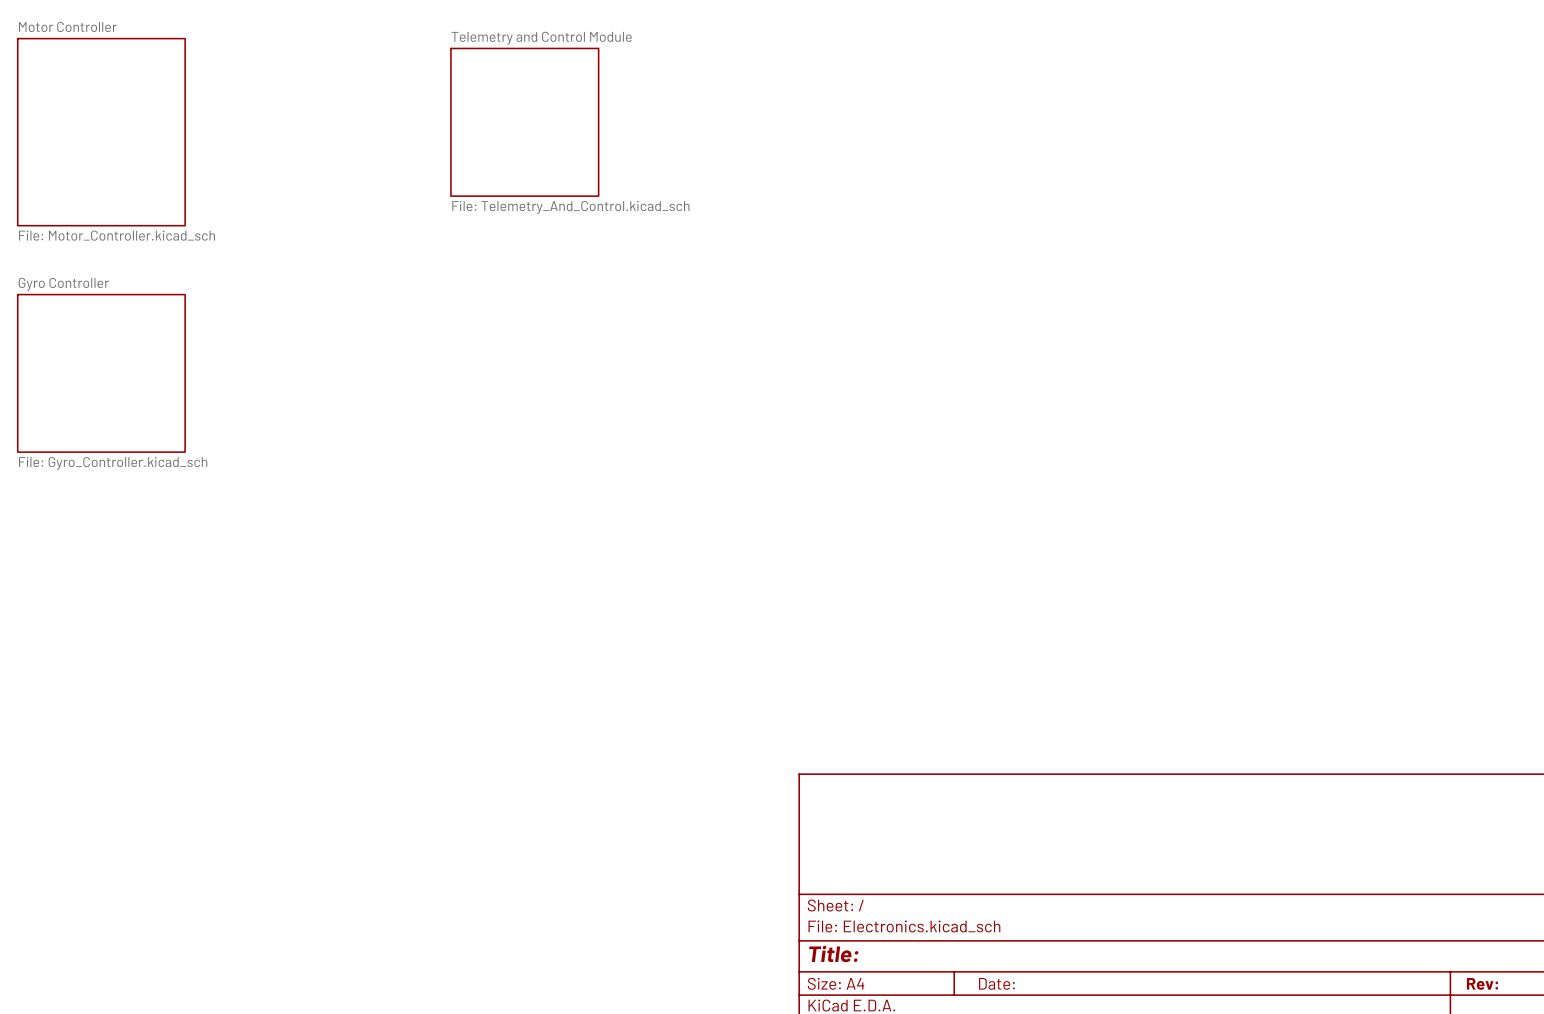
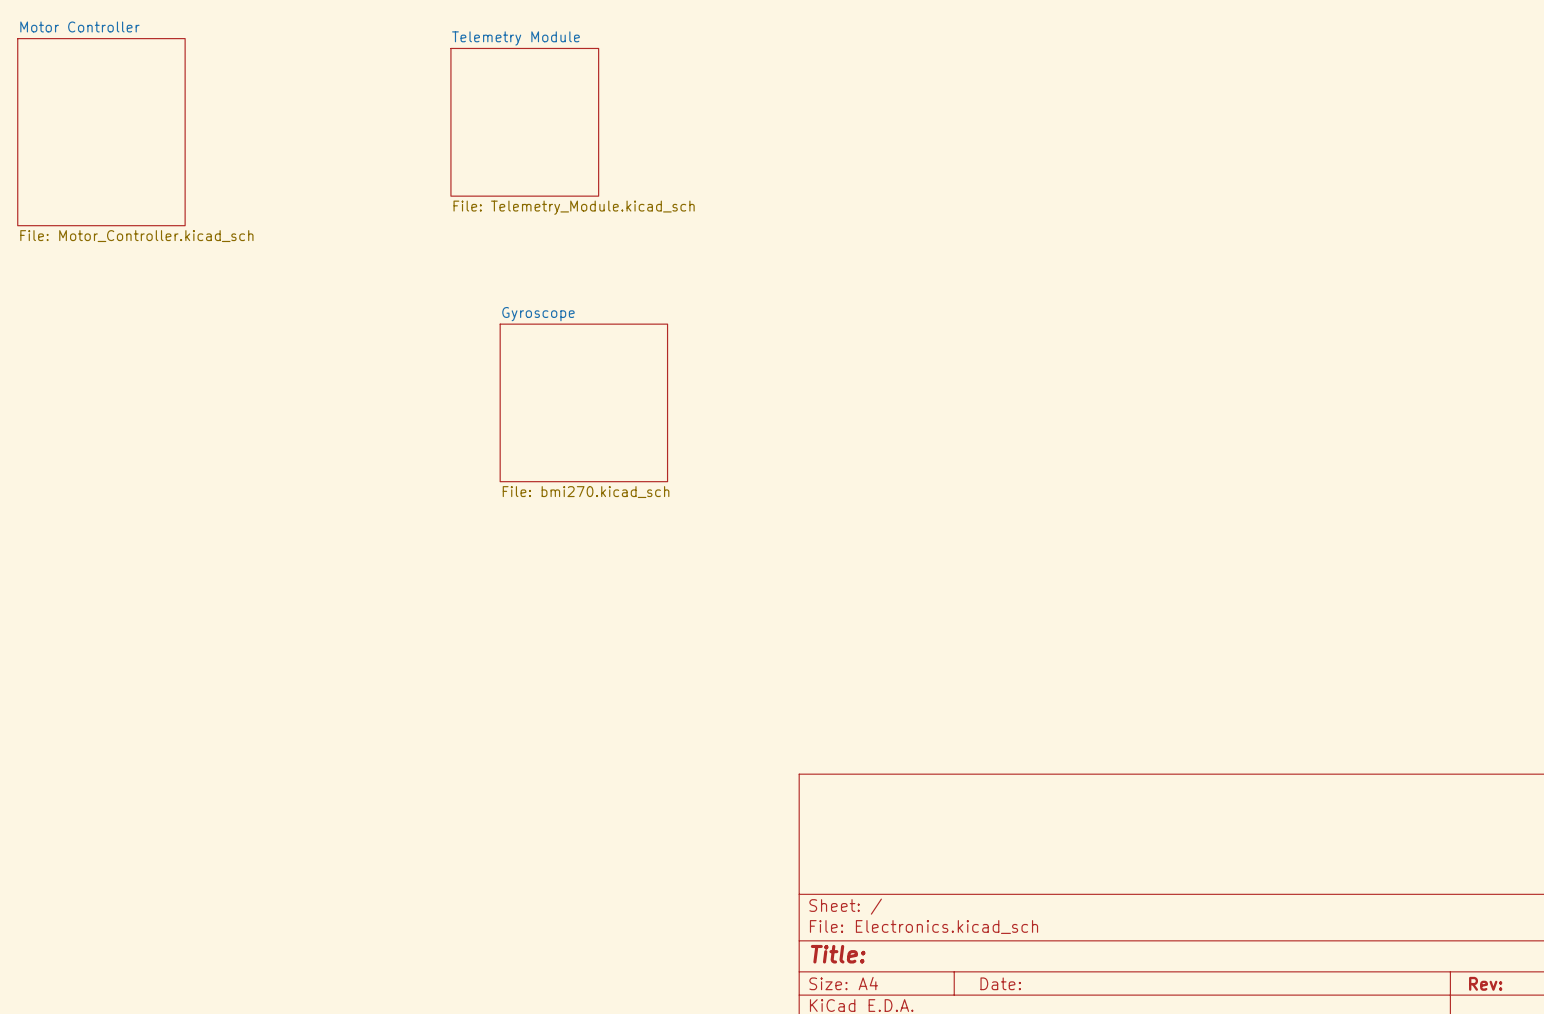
sheet Telemetry and Control Module name: Telemetry and Control Module (541, 38) -> Telemetry Module (515, 38)
sheet Telemetry and Control Module value: File: Telemetry_And_Control.kicad_sch (570, 207) -> File: Telemetry_Module.kicad_sch (574, 207)
sheet Gyro Controller: File: Gyro_Controller.kicad_sch (101, 373) -> none
sheet Gyroscope: none -> File: bmi270.kicad_sch (583, 402)

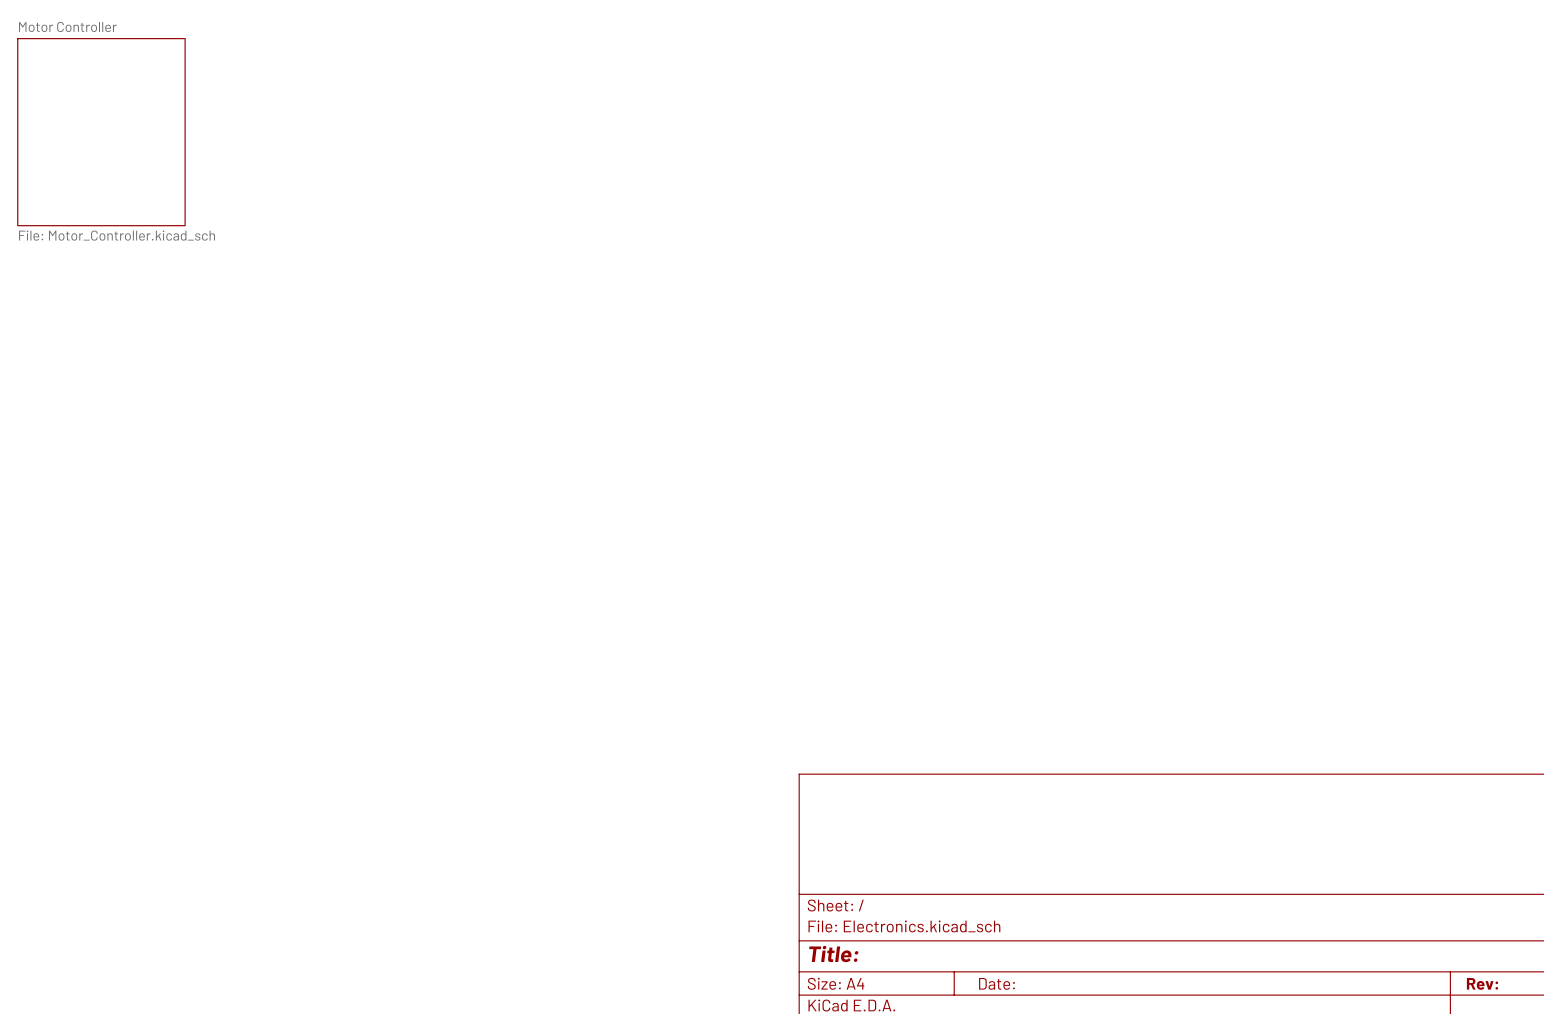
sheet Telemetry Module: File: Telemetry_Module.kicad_sch (524, 122) -> none
sheet Gyroscope: File: bmi270.kicad_sch (583, 402) -> none

